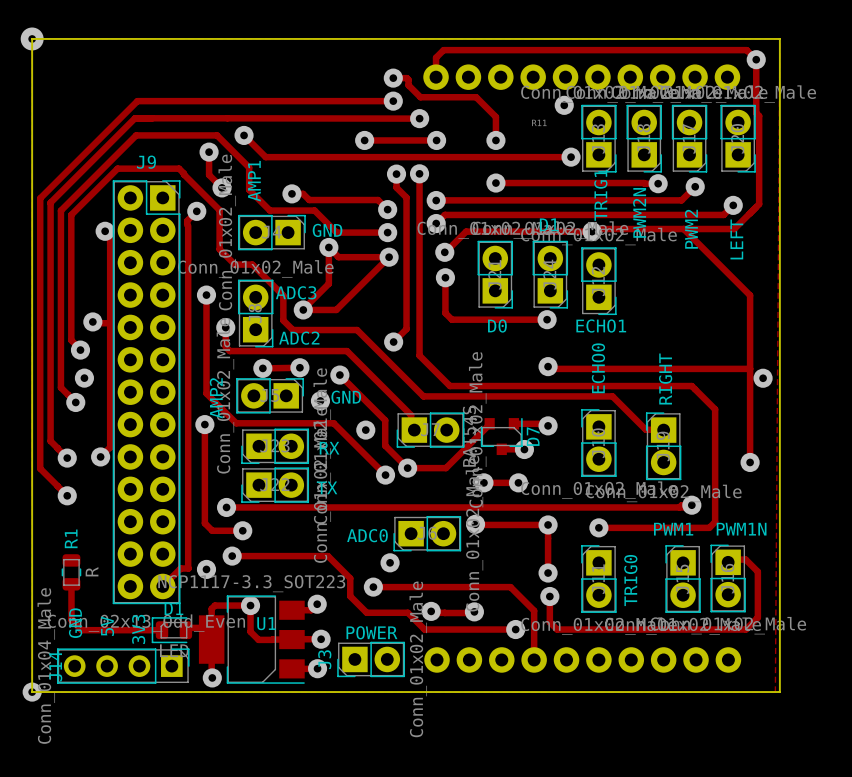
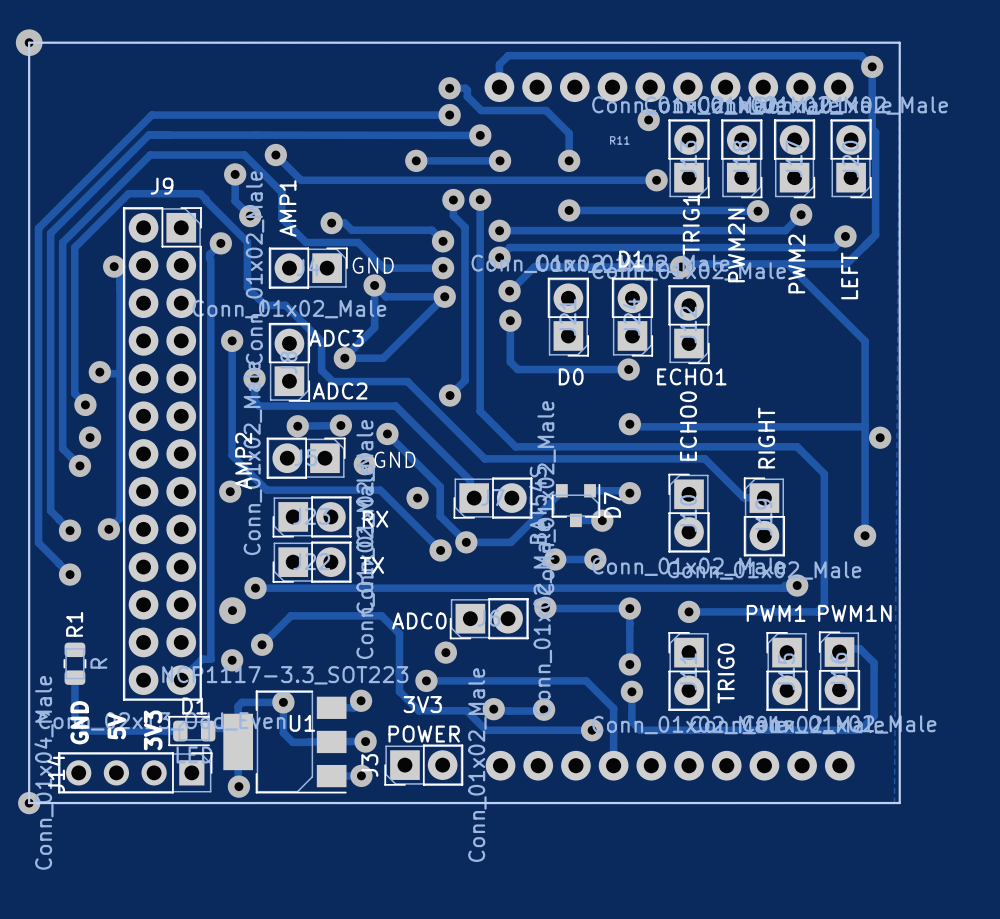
track: (204, 424) (204, 523) (212, 530) (242, 530) -> none
via: none -> (232, 610)
via: (242, 530) -> none
track: (232, 556) (327, 556) (350, 578) -> (262, 644) (290, 615) (381, 615) (399, 633) (399, 670)
text: none -> 3V3 (422, 704)

